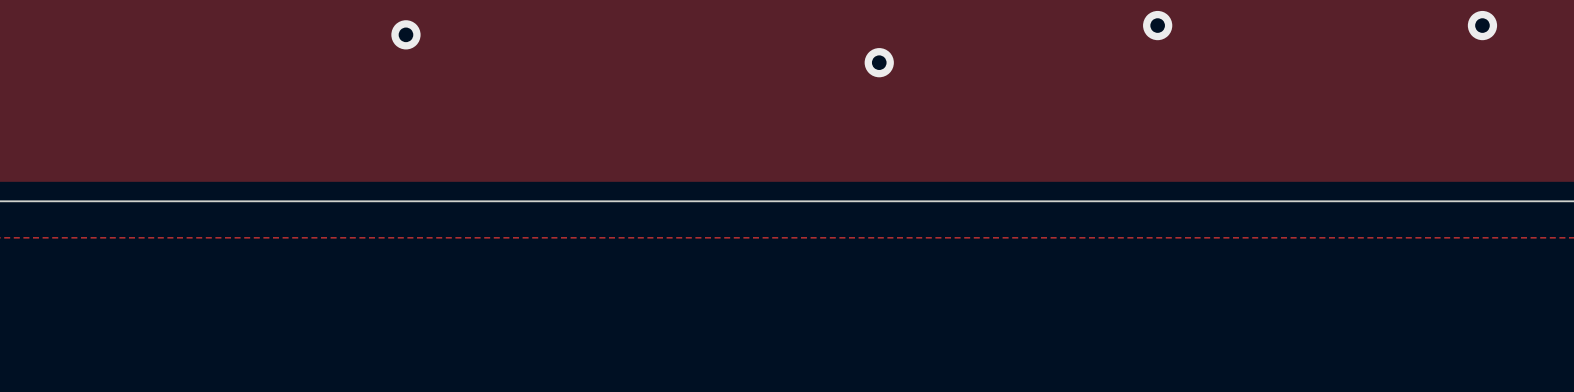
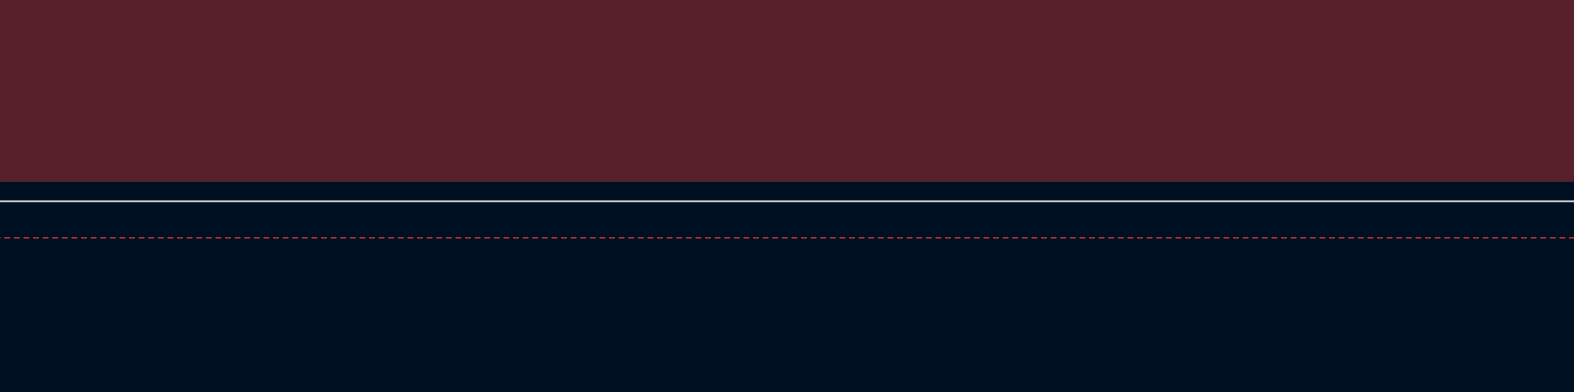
via: (1157, 25) -> none
via: (1482, 25) -> none
via: (405, 34) -> none
via: (879, 62) -> none

